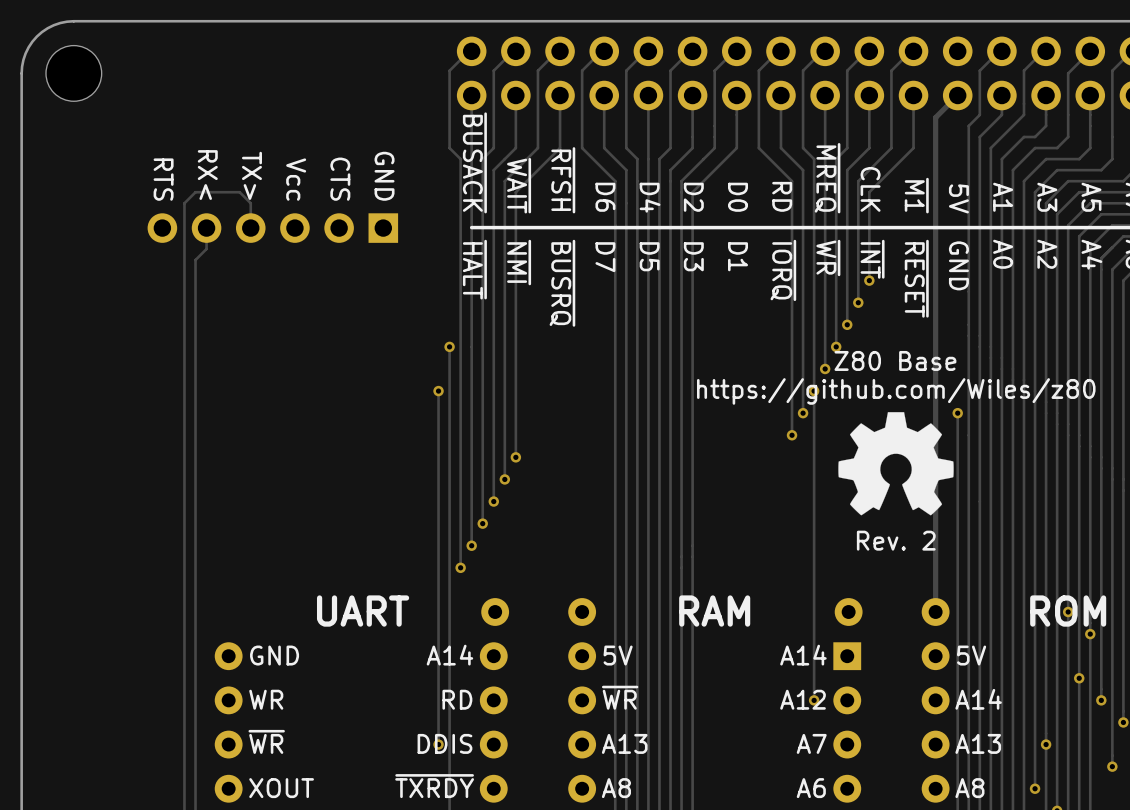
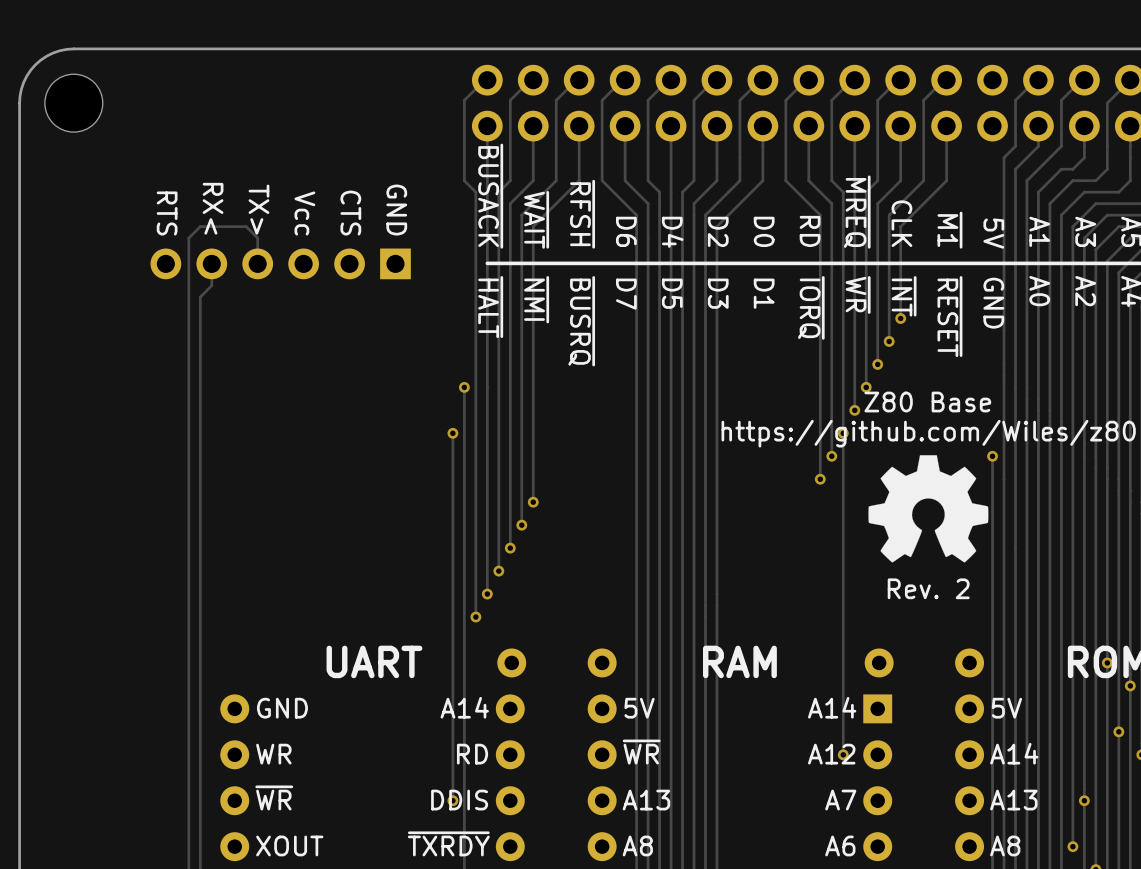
track: (957, 95) (935, 117) (935, 612) -> none

